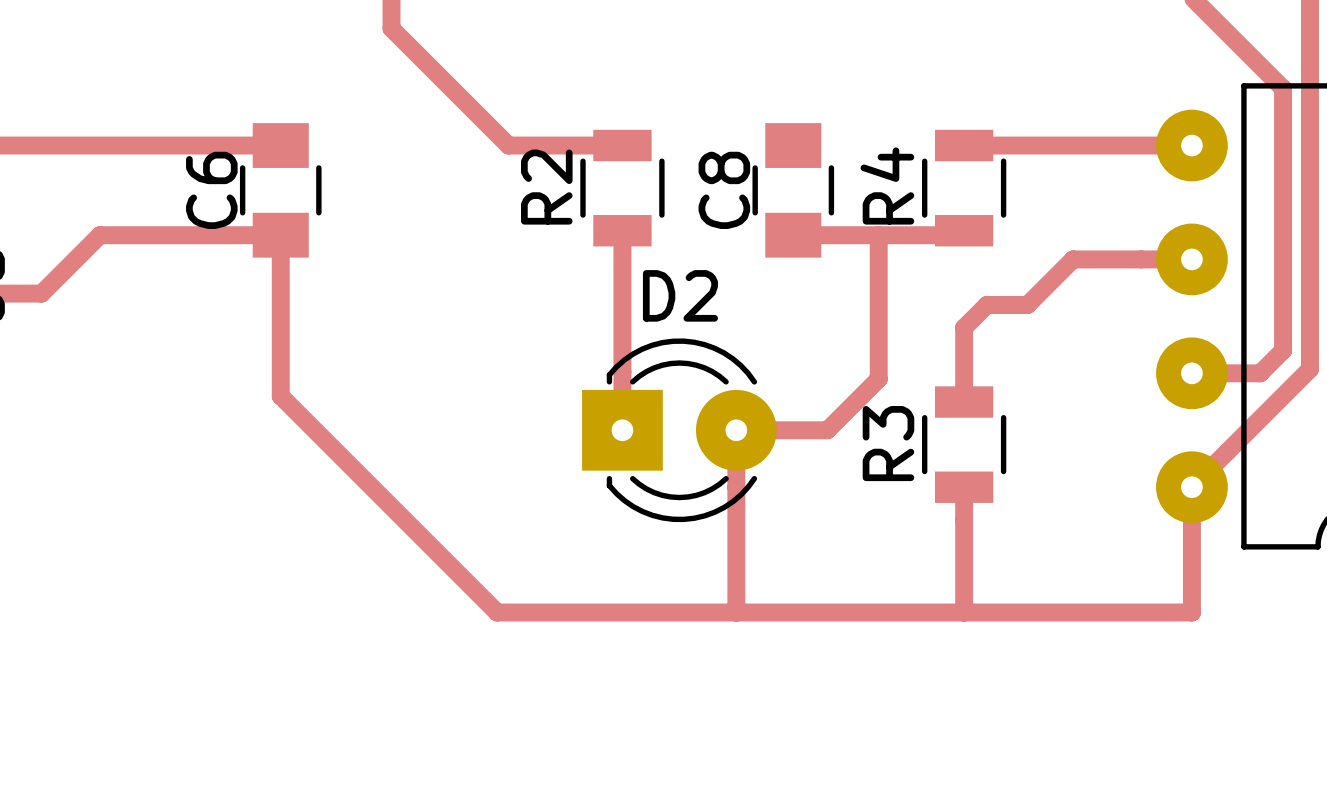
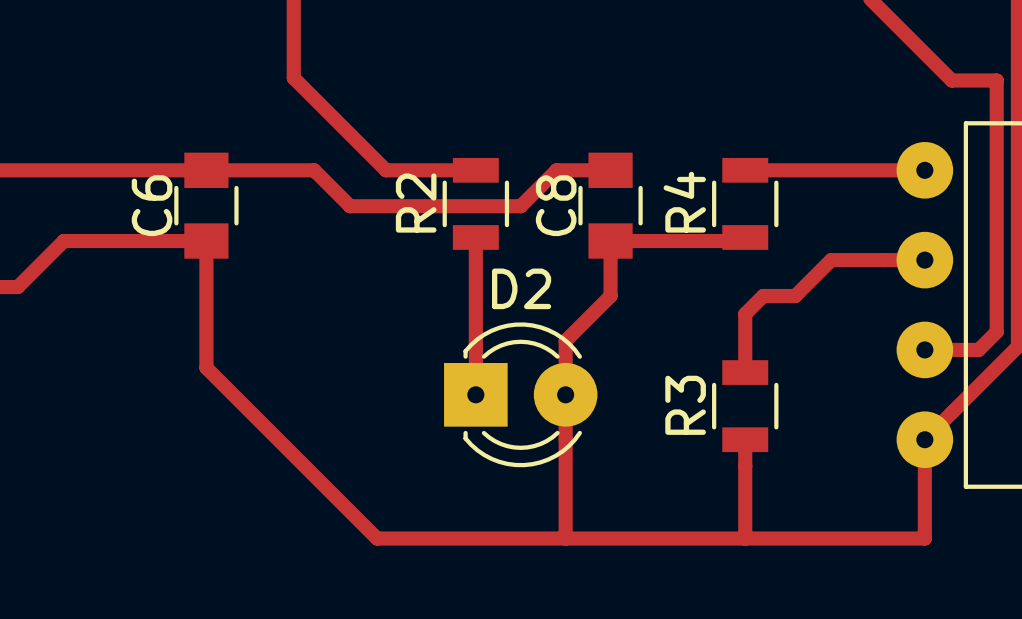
track: (1226, 31) (1283, 88) -> (951, 80) (996, 80) (996, 125)
track: none -> (206, 170) (314, 170) (350, 206) (520, 206) (556, 170) (610, 170)
track: (878, 235) (878, 379) (827, 430) (736, 430) -> (610, 241) (610, 296) (565, 340) (565, 394)

